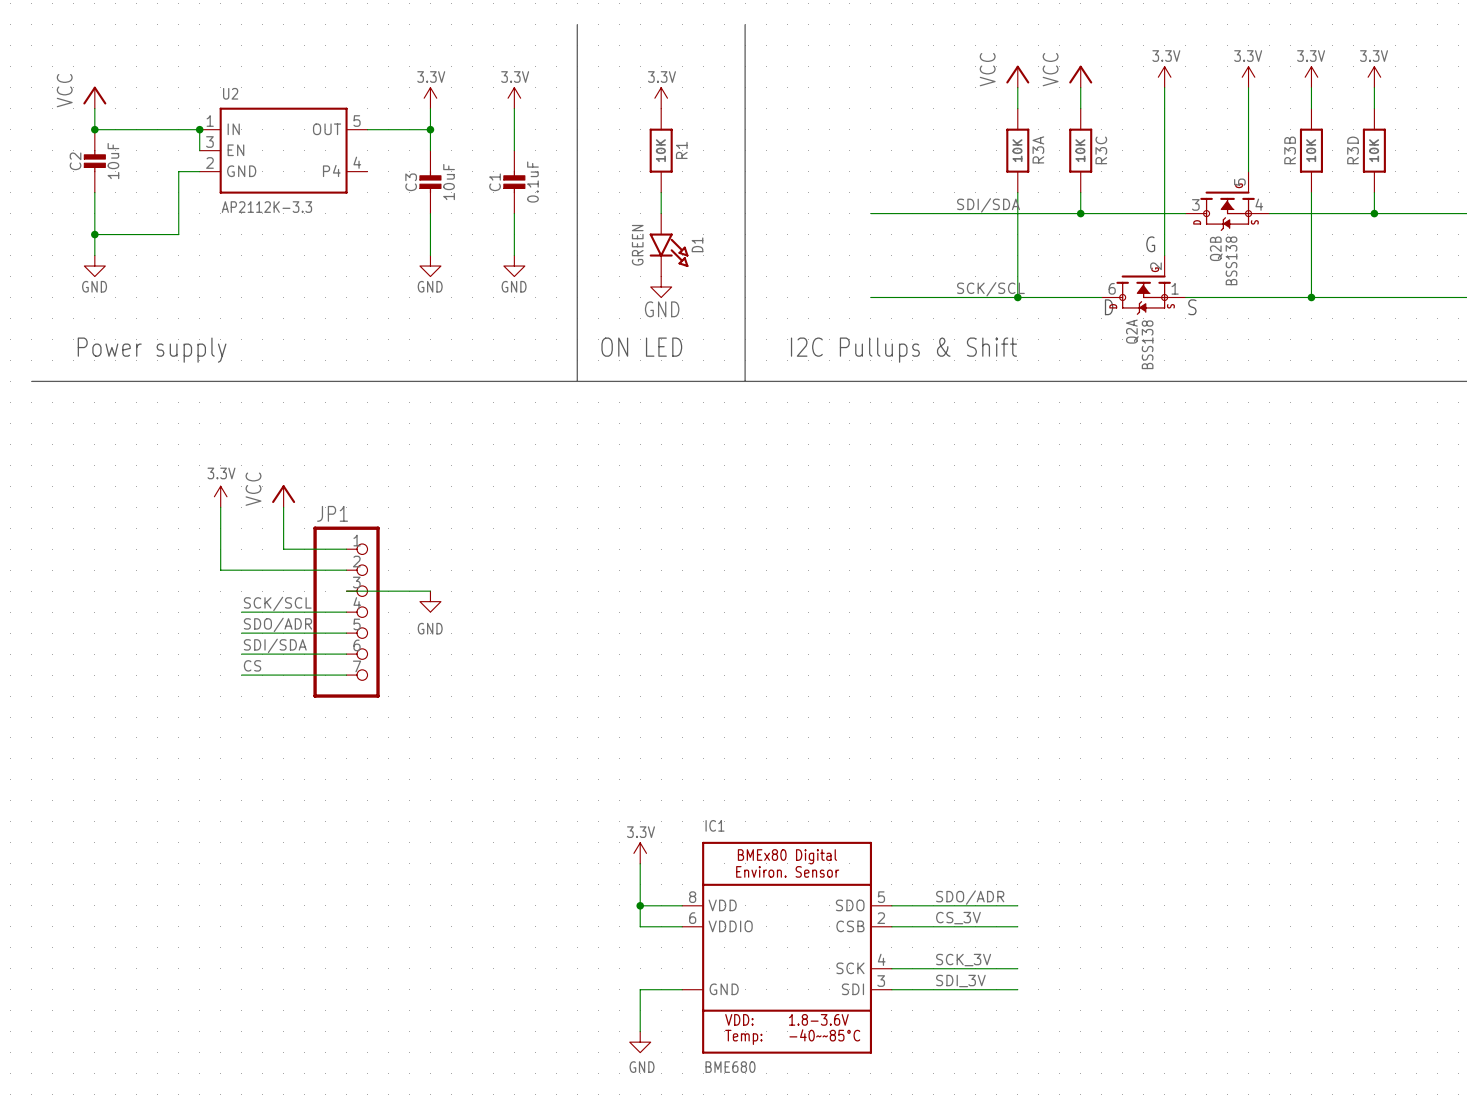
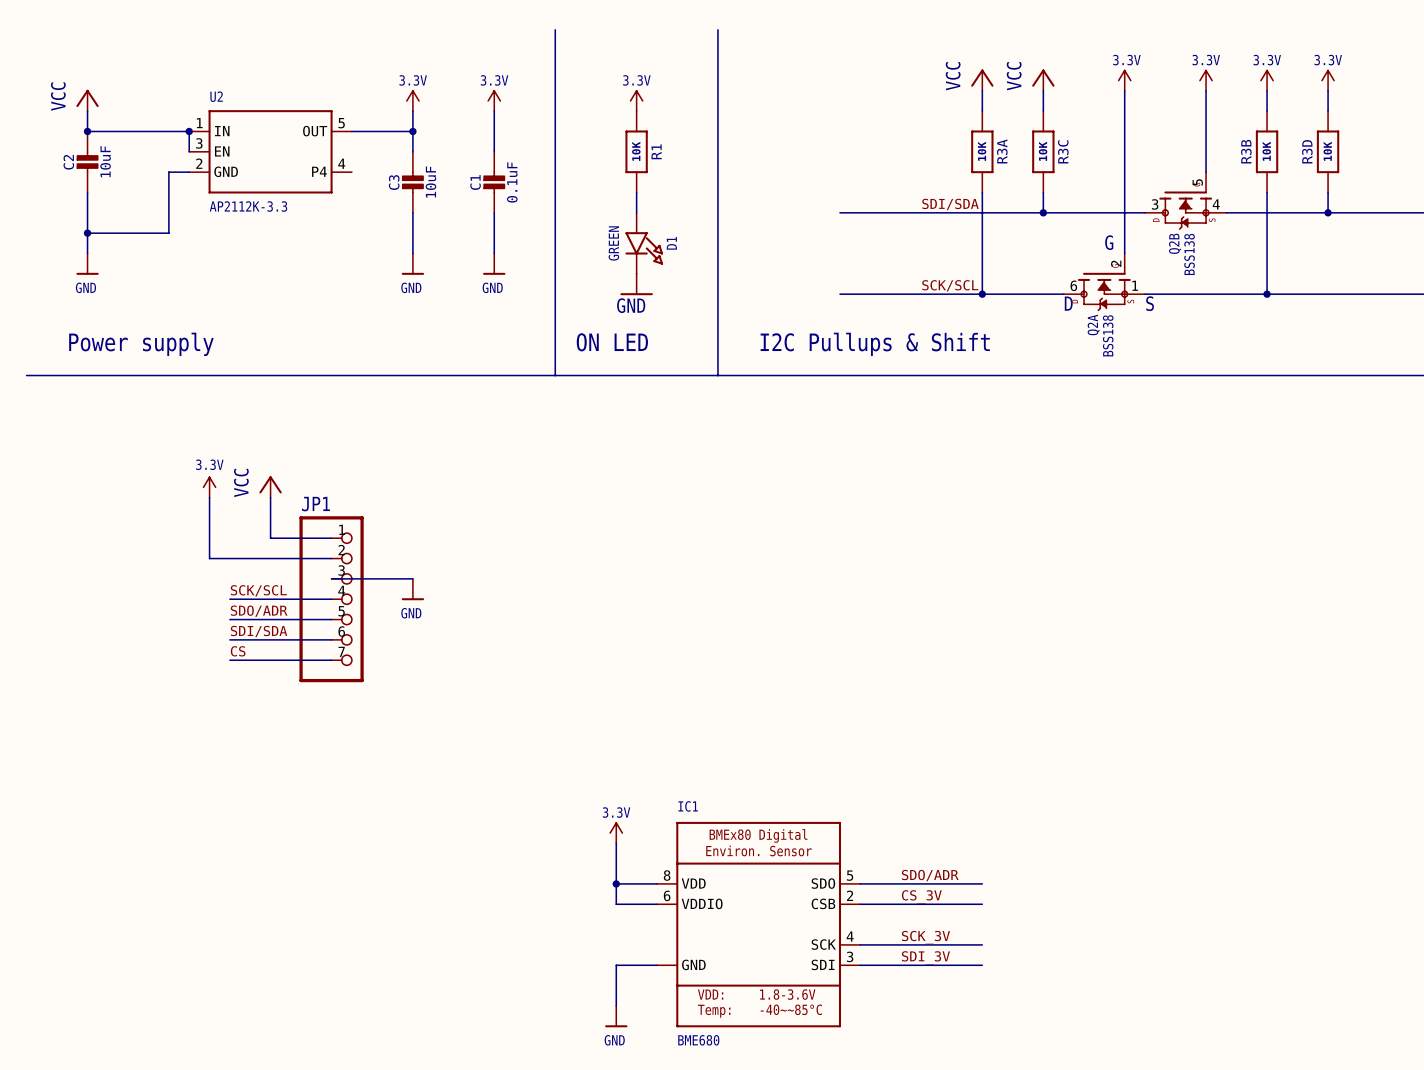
power symbol shape: [84, 255, 106, 277] -> [76, 253, 99, 275]
power symbol shape: [419, 255, 441, 277] -> [401, 253, 425, 275]
power symbol shape: [503, 255, 525, 277] -> [483, 253, 506, 275]
power symbol shape: [650, 276, 672, 298] -> [620, 273, 653, 296]
power symbol shape: [419, 591, 441, 613] -> [401, 578, 425, 601]
power symbol shape: [629, 1031, 651, 1053] -> [605, 1005, 628, 1028]

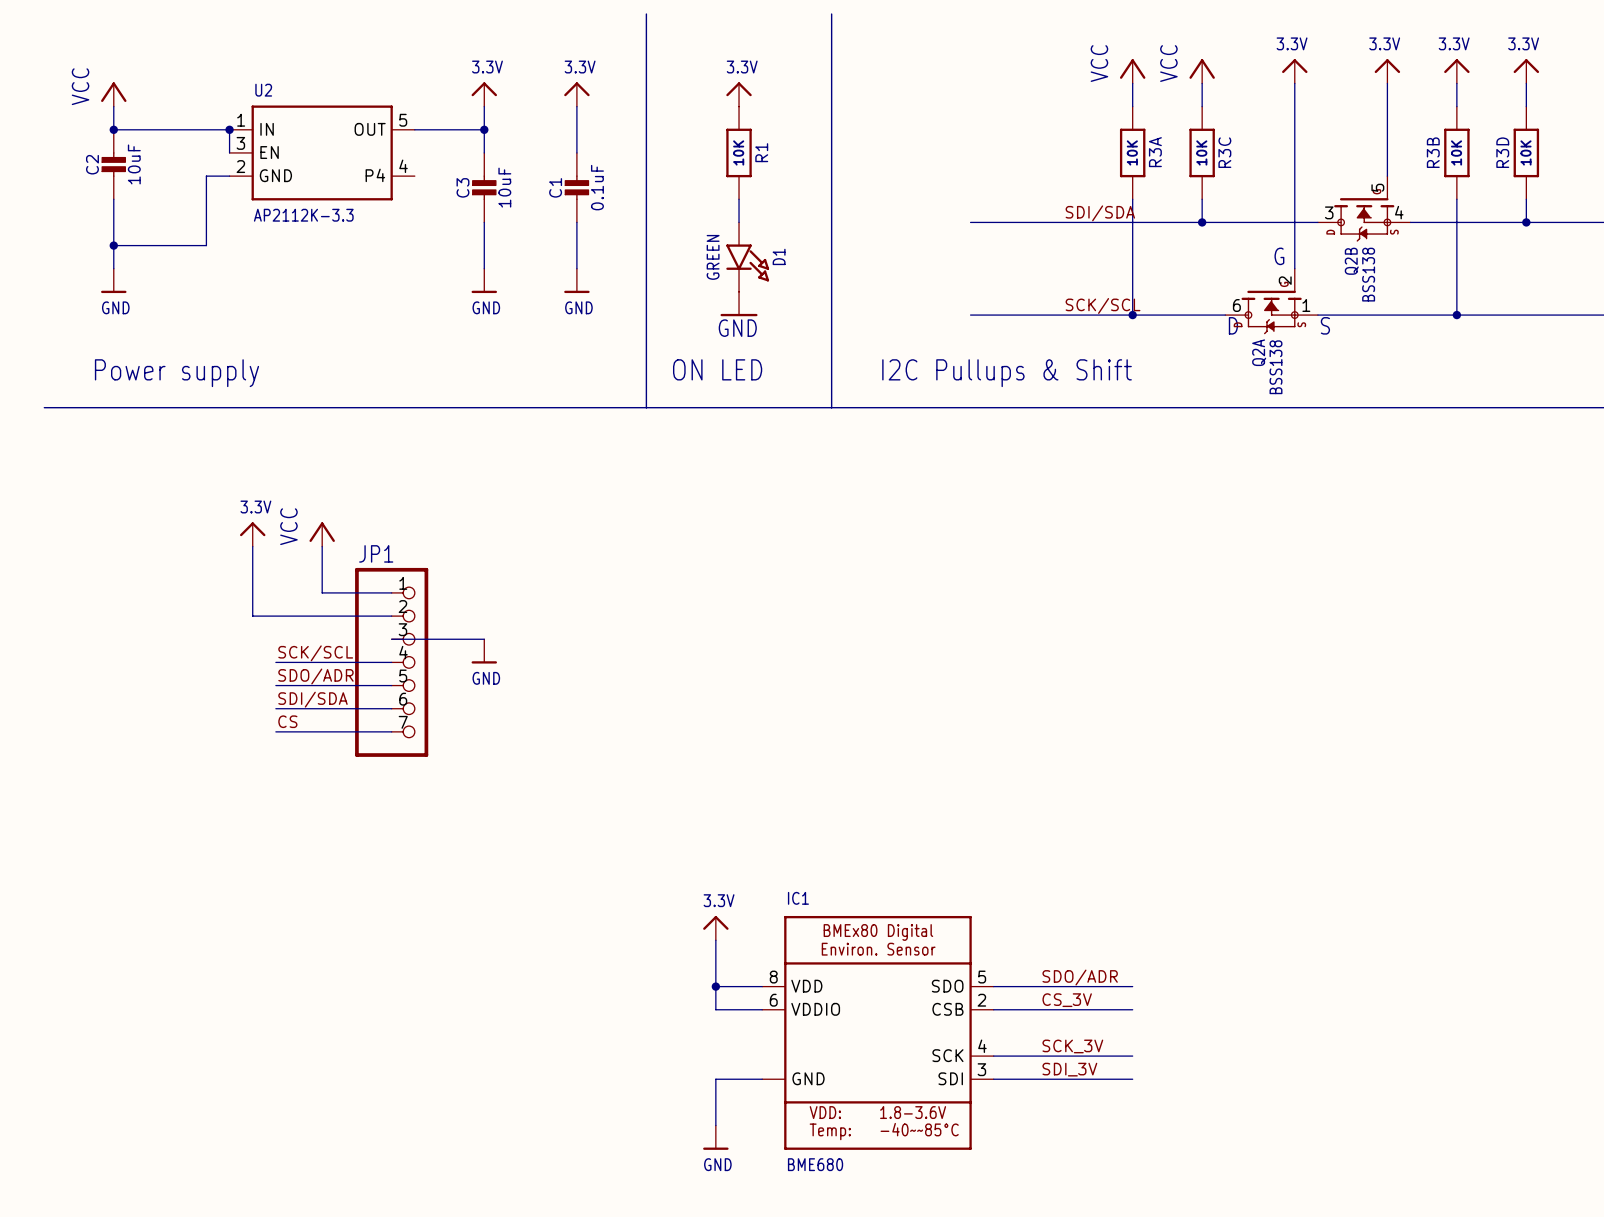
power symbol shape: [1118, 70, 1131, 91] -> [1282, 59, 1308, 84]
power symbol shape: [1199, 70, 1213, 91] -> [1374, 59, 1401, 84]
power symbol shape: [1260, 70, 1274, 91] -> [1444, 59, 1470, 84]
power symbol shape: [1321, 70, 1335, 91] -> [1513, 59, 1540, 84]
power symbol shape: [406, 90, 420, 112] -> [471, 82, 498, 107]
power symbol shape: [488, 90, 501, 112] -> [564, 82, 590, 107]
power symbol shape: [630, 90, 643, 112] -> [726, 82, 752, 107]
power symbol shape: [203, 477, 216, 498] -> [239, 522, 266, 547]
power symbol shape: [610, 822, 623, 844] -> [703, 915, 729, 941]

